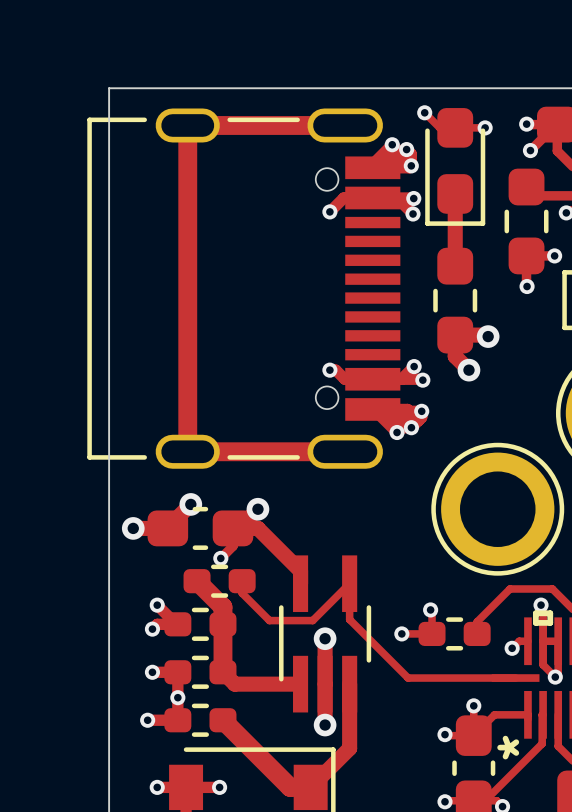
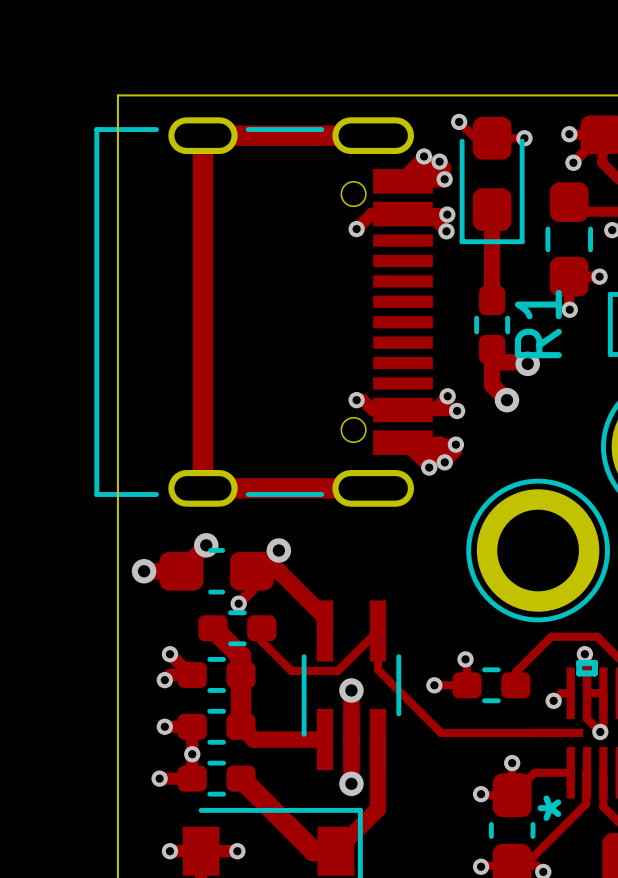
part: (455, 300) -> none
R1: none -> (492, 325)

